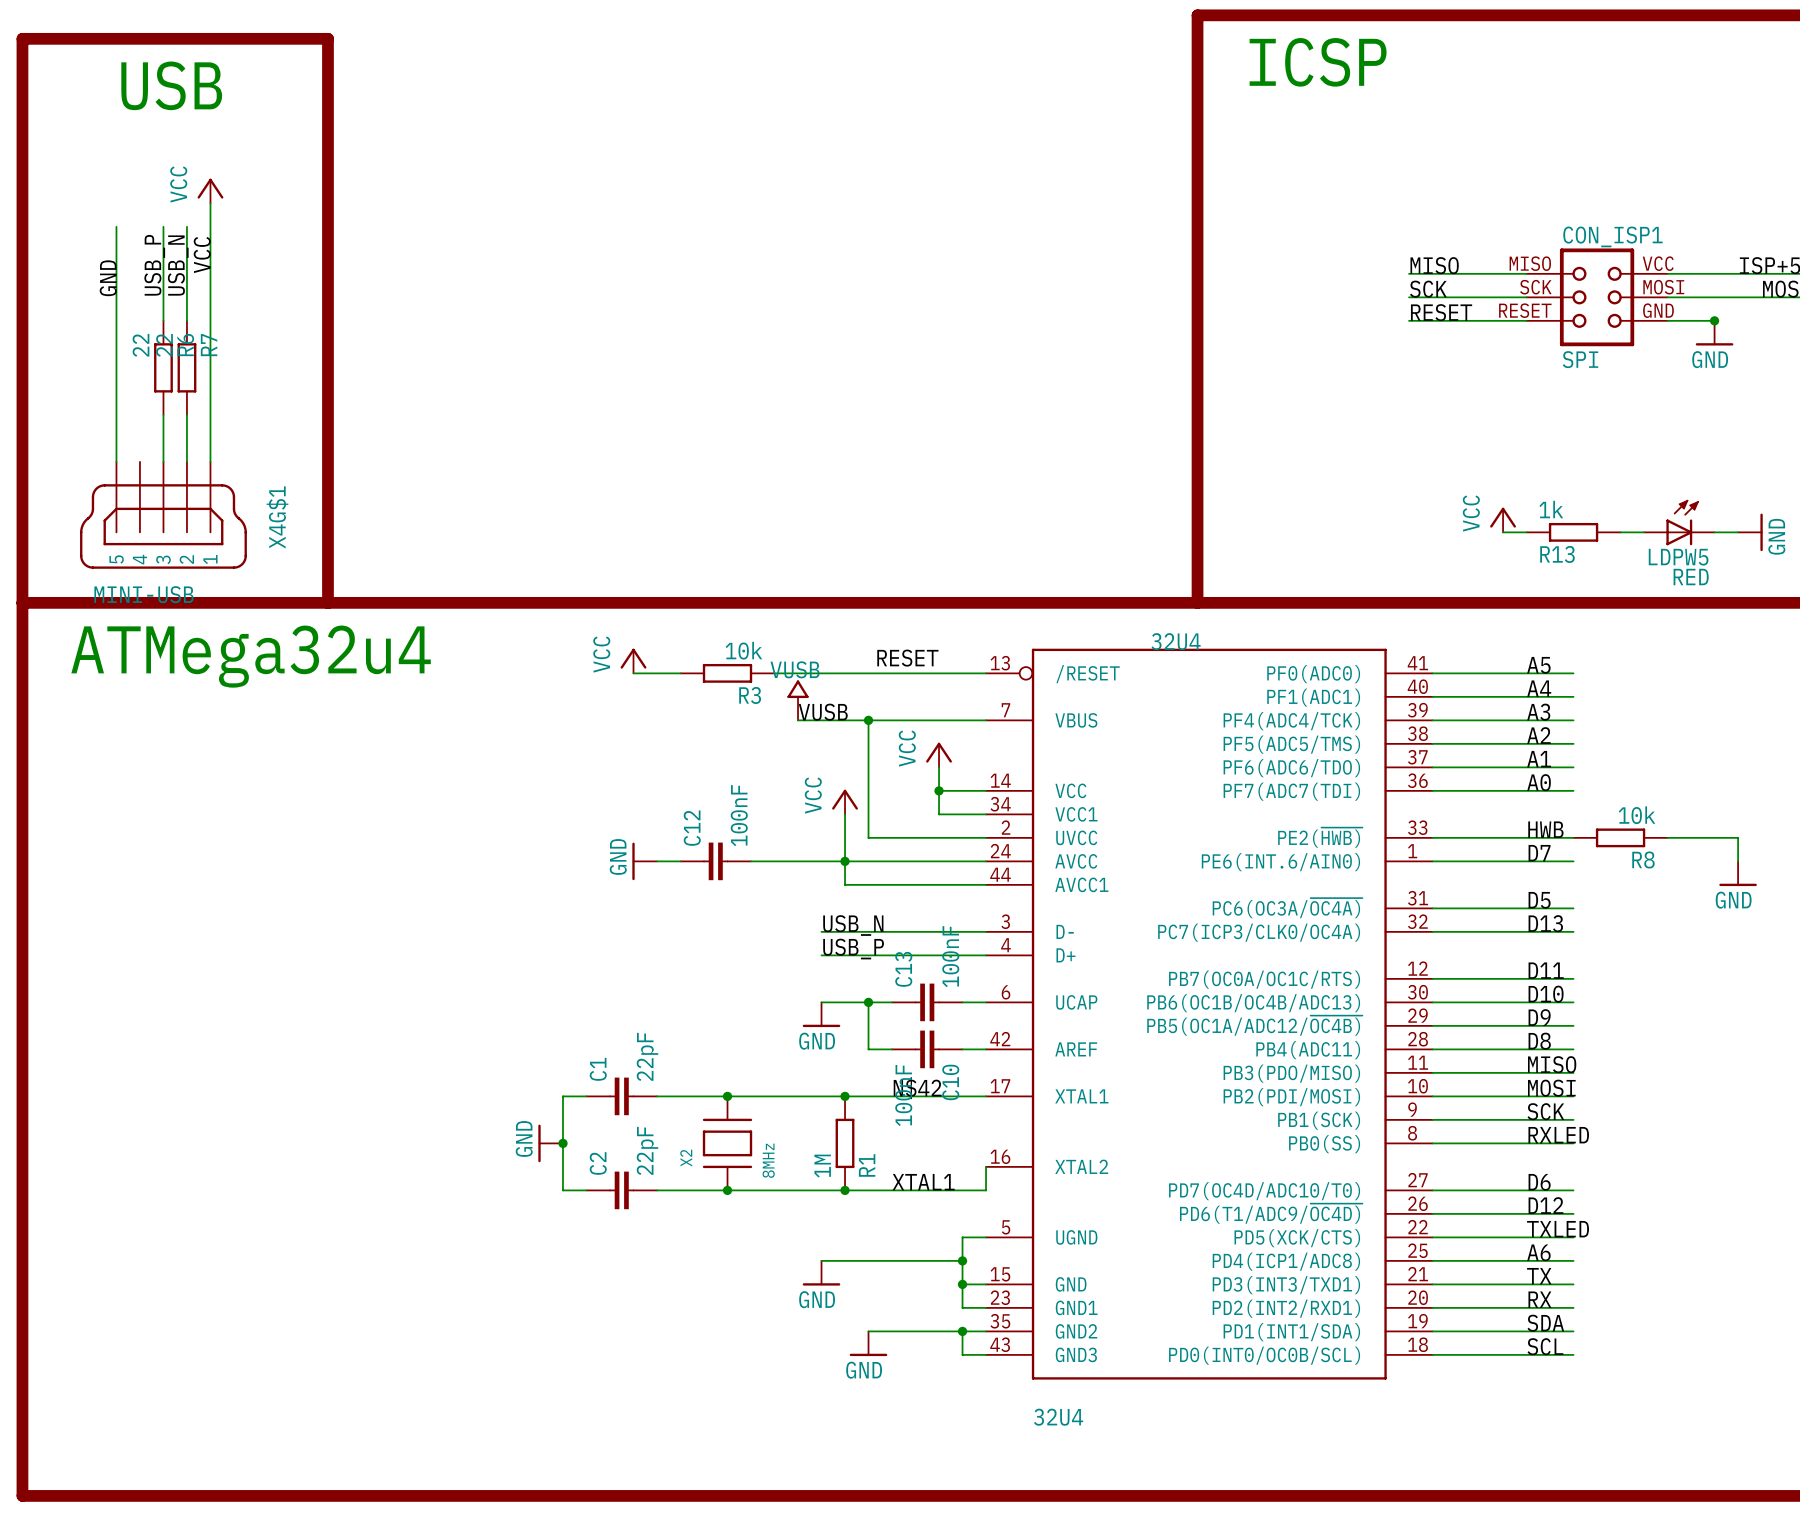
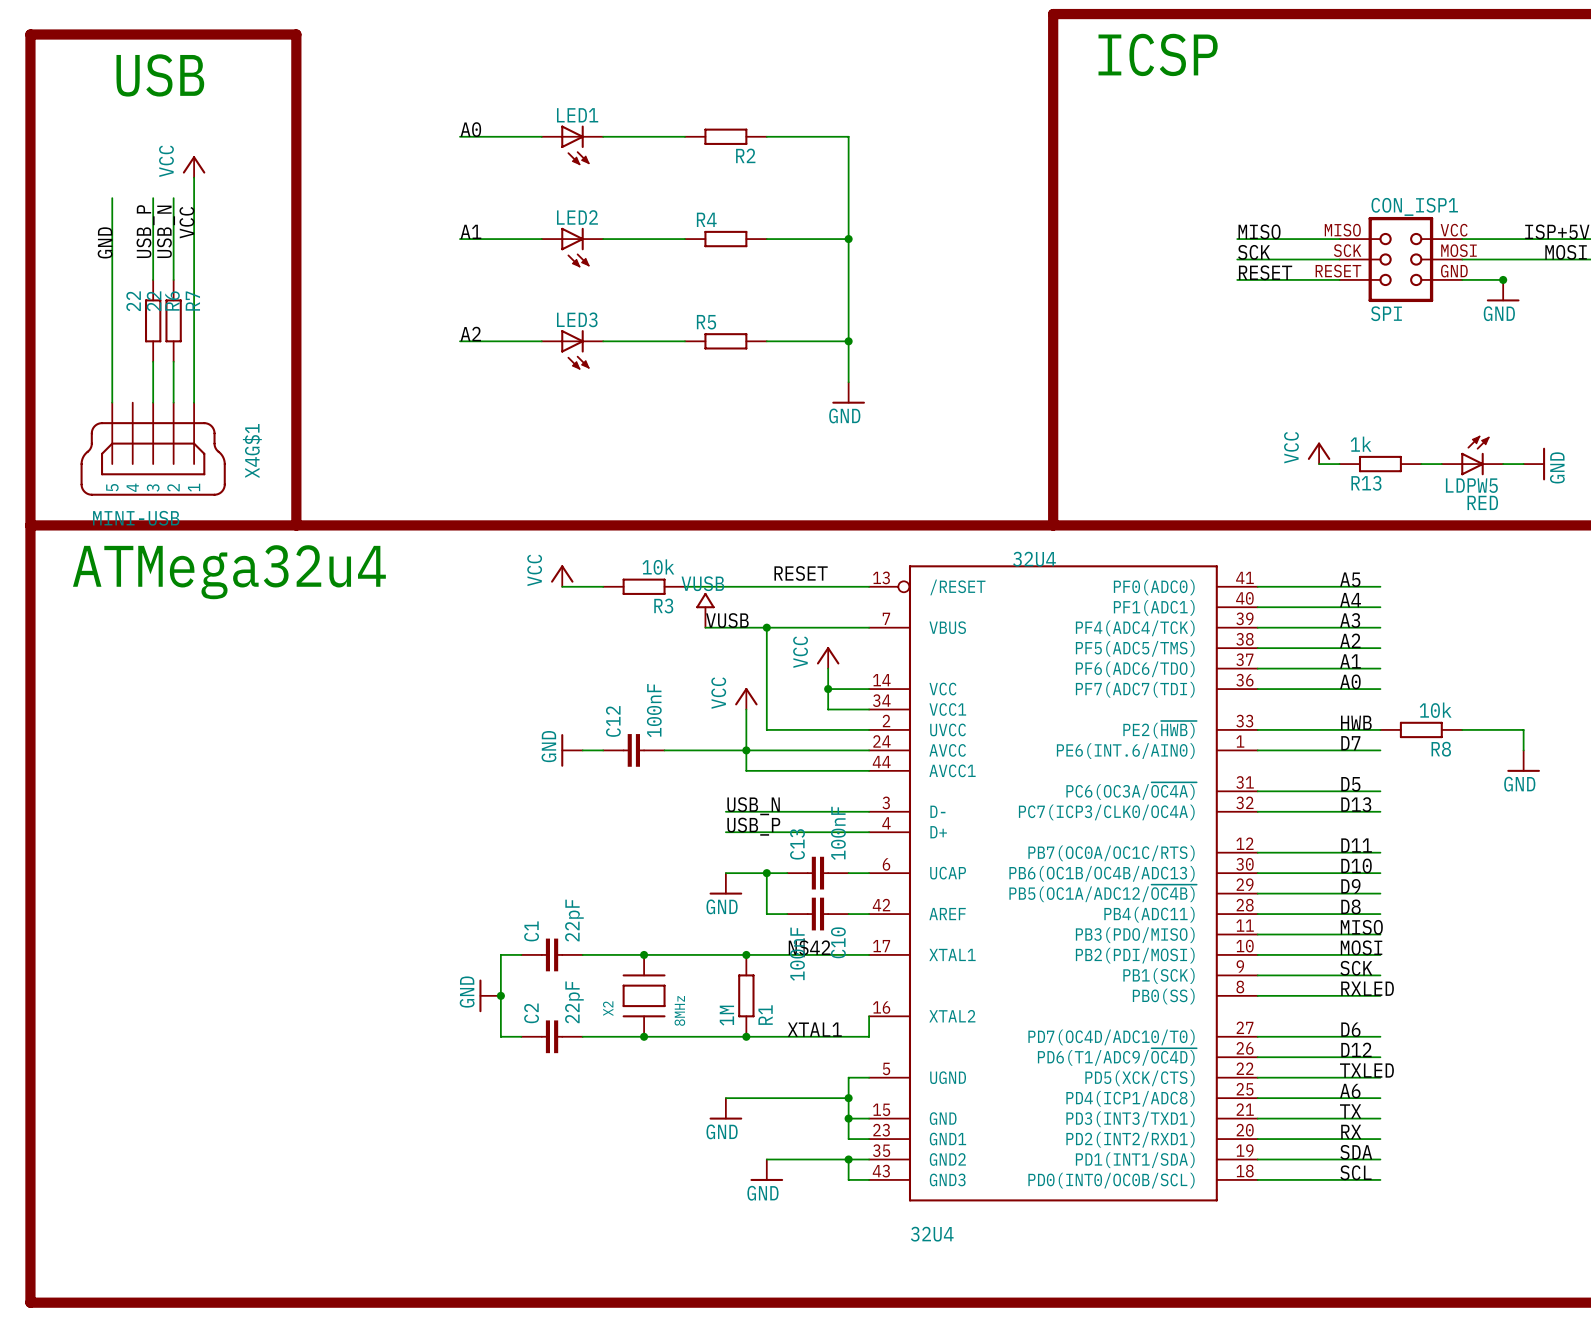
label: none -> A0 (470, 129)
wire: none -> (459, 136) (541, 136)
wire: none -> (603, 136) (684, 136)
R2: none -> (725, 136)
wire: none -> (766, 136) (848, 136) (848, 382)
LED1: none -> (572, 145)
label: none -> A1 (470, 231)
wire: none -> (459, 239) (541, 239)
wire: none -> (603, 239) (684, 239)
R4: none -> (725, 239)
wire: none -> (766, 239) (848, 239)
junction: none -> (848, 239)
LED2: none -> (572, 247)
label: none -> A2 (470, 334)
wire: none -> (459, 341) (541, 341)
wire: none -> (603, 341) (684, 341)
R5: none -> (725, 341)
wire: none -> (766, 341) (848, 341)
junction: none -> (848, 341)
LED3: none -> (572, 349)
power symbol: none -> GND (848, 392)

